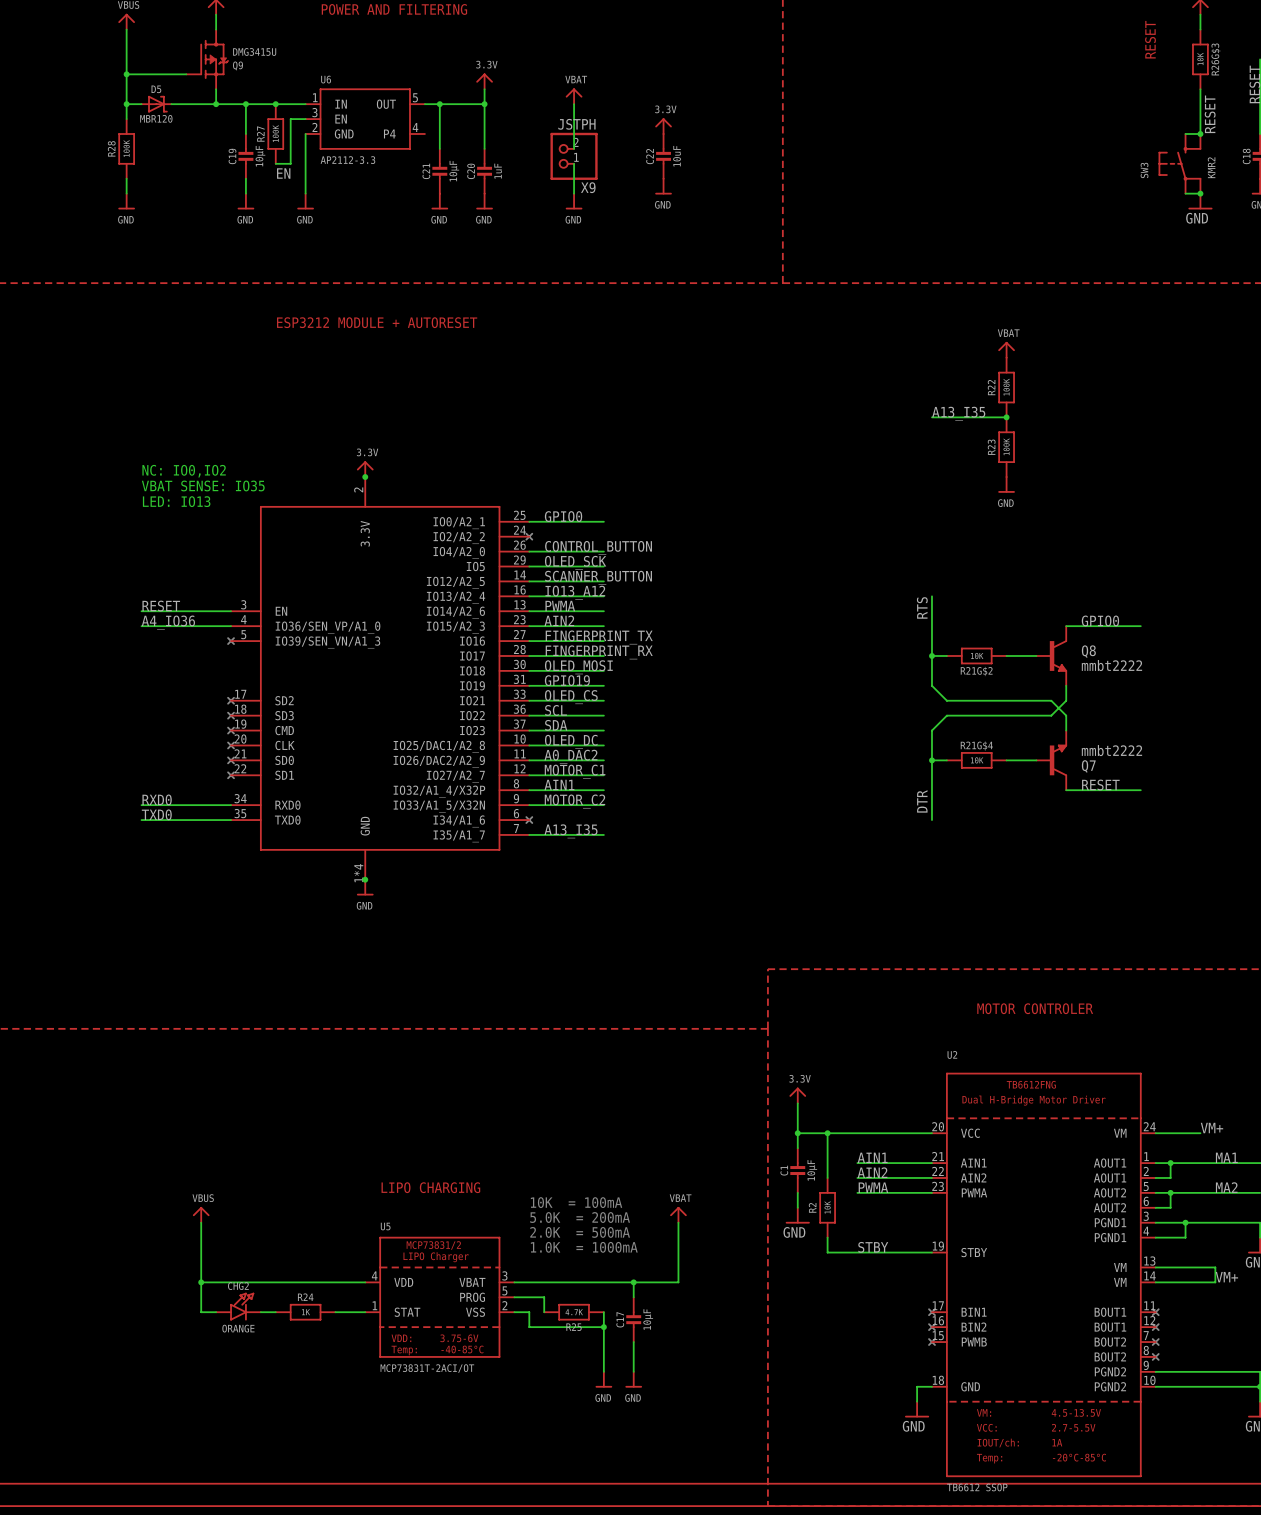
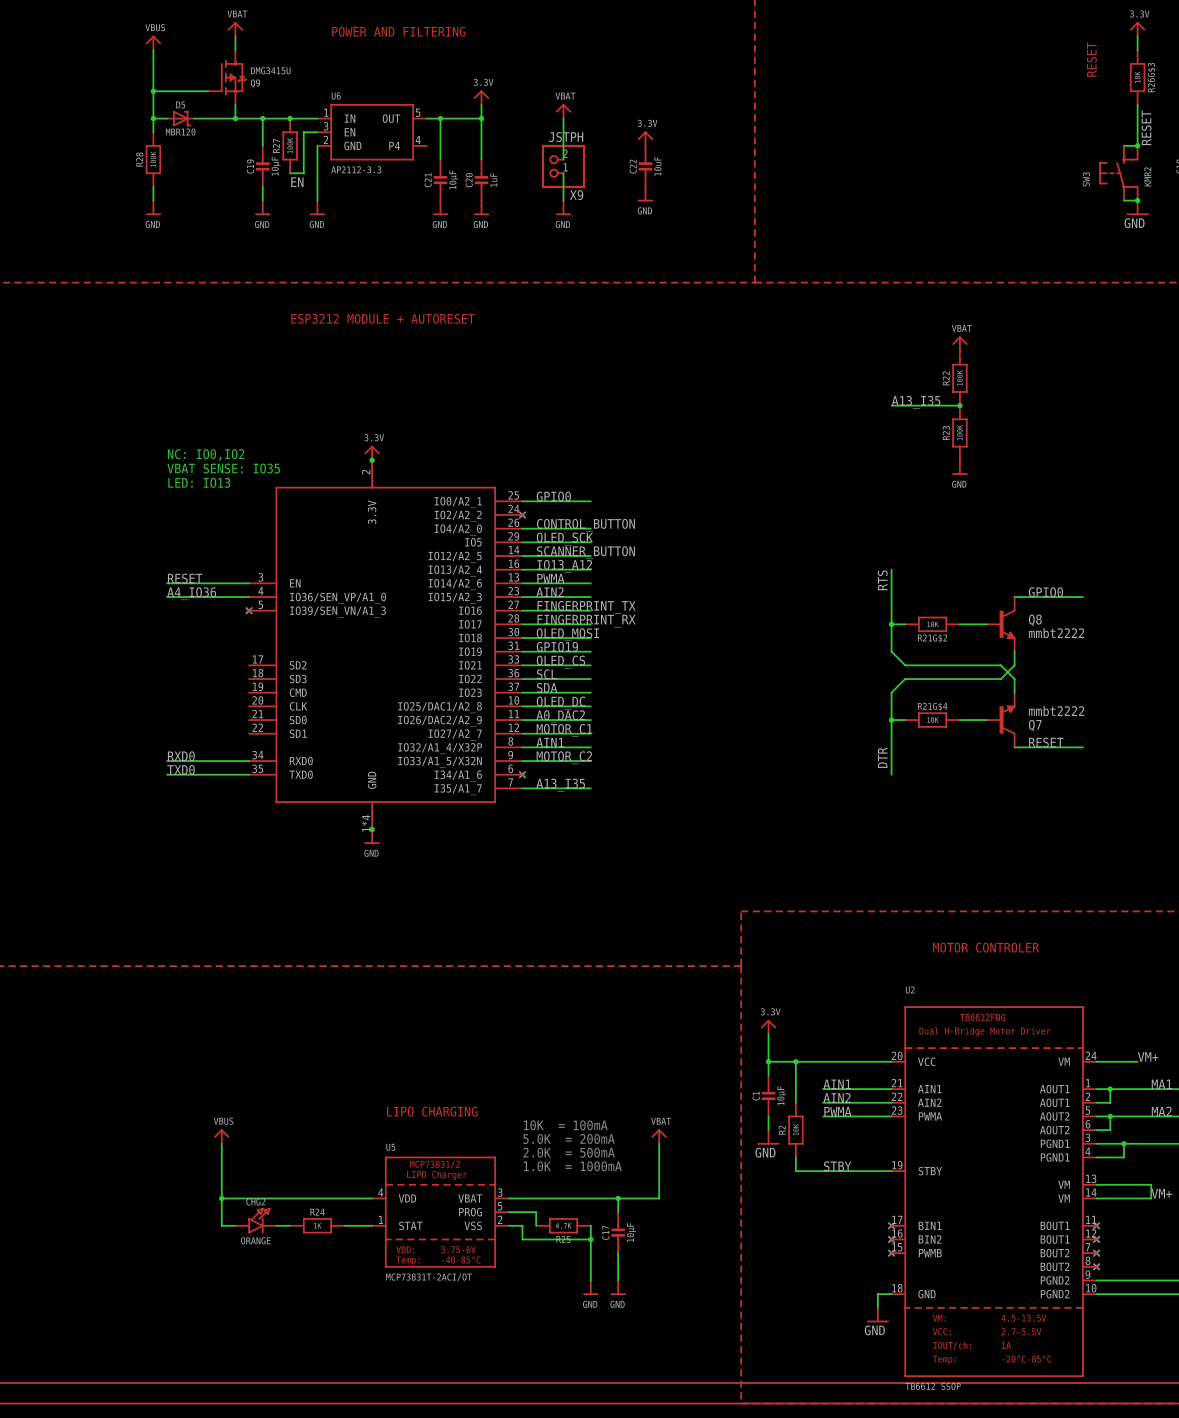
part: (231, 700) -> none
part: (231, 715) -> none
part: (231, 730) -> none
part: (231, 745) -> none
part: (231, 760) -> none
part: (231, 775) -> none

